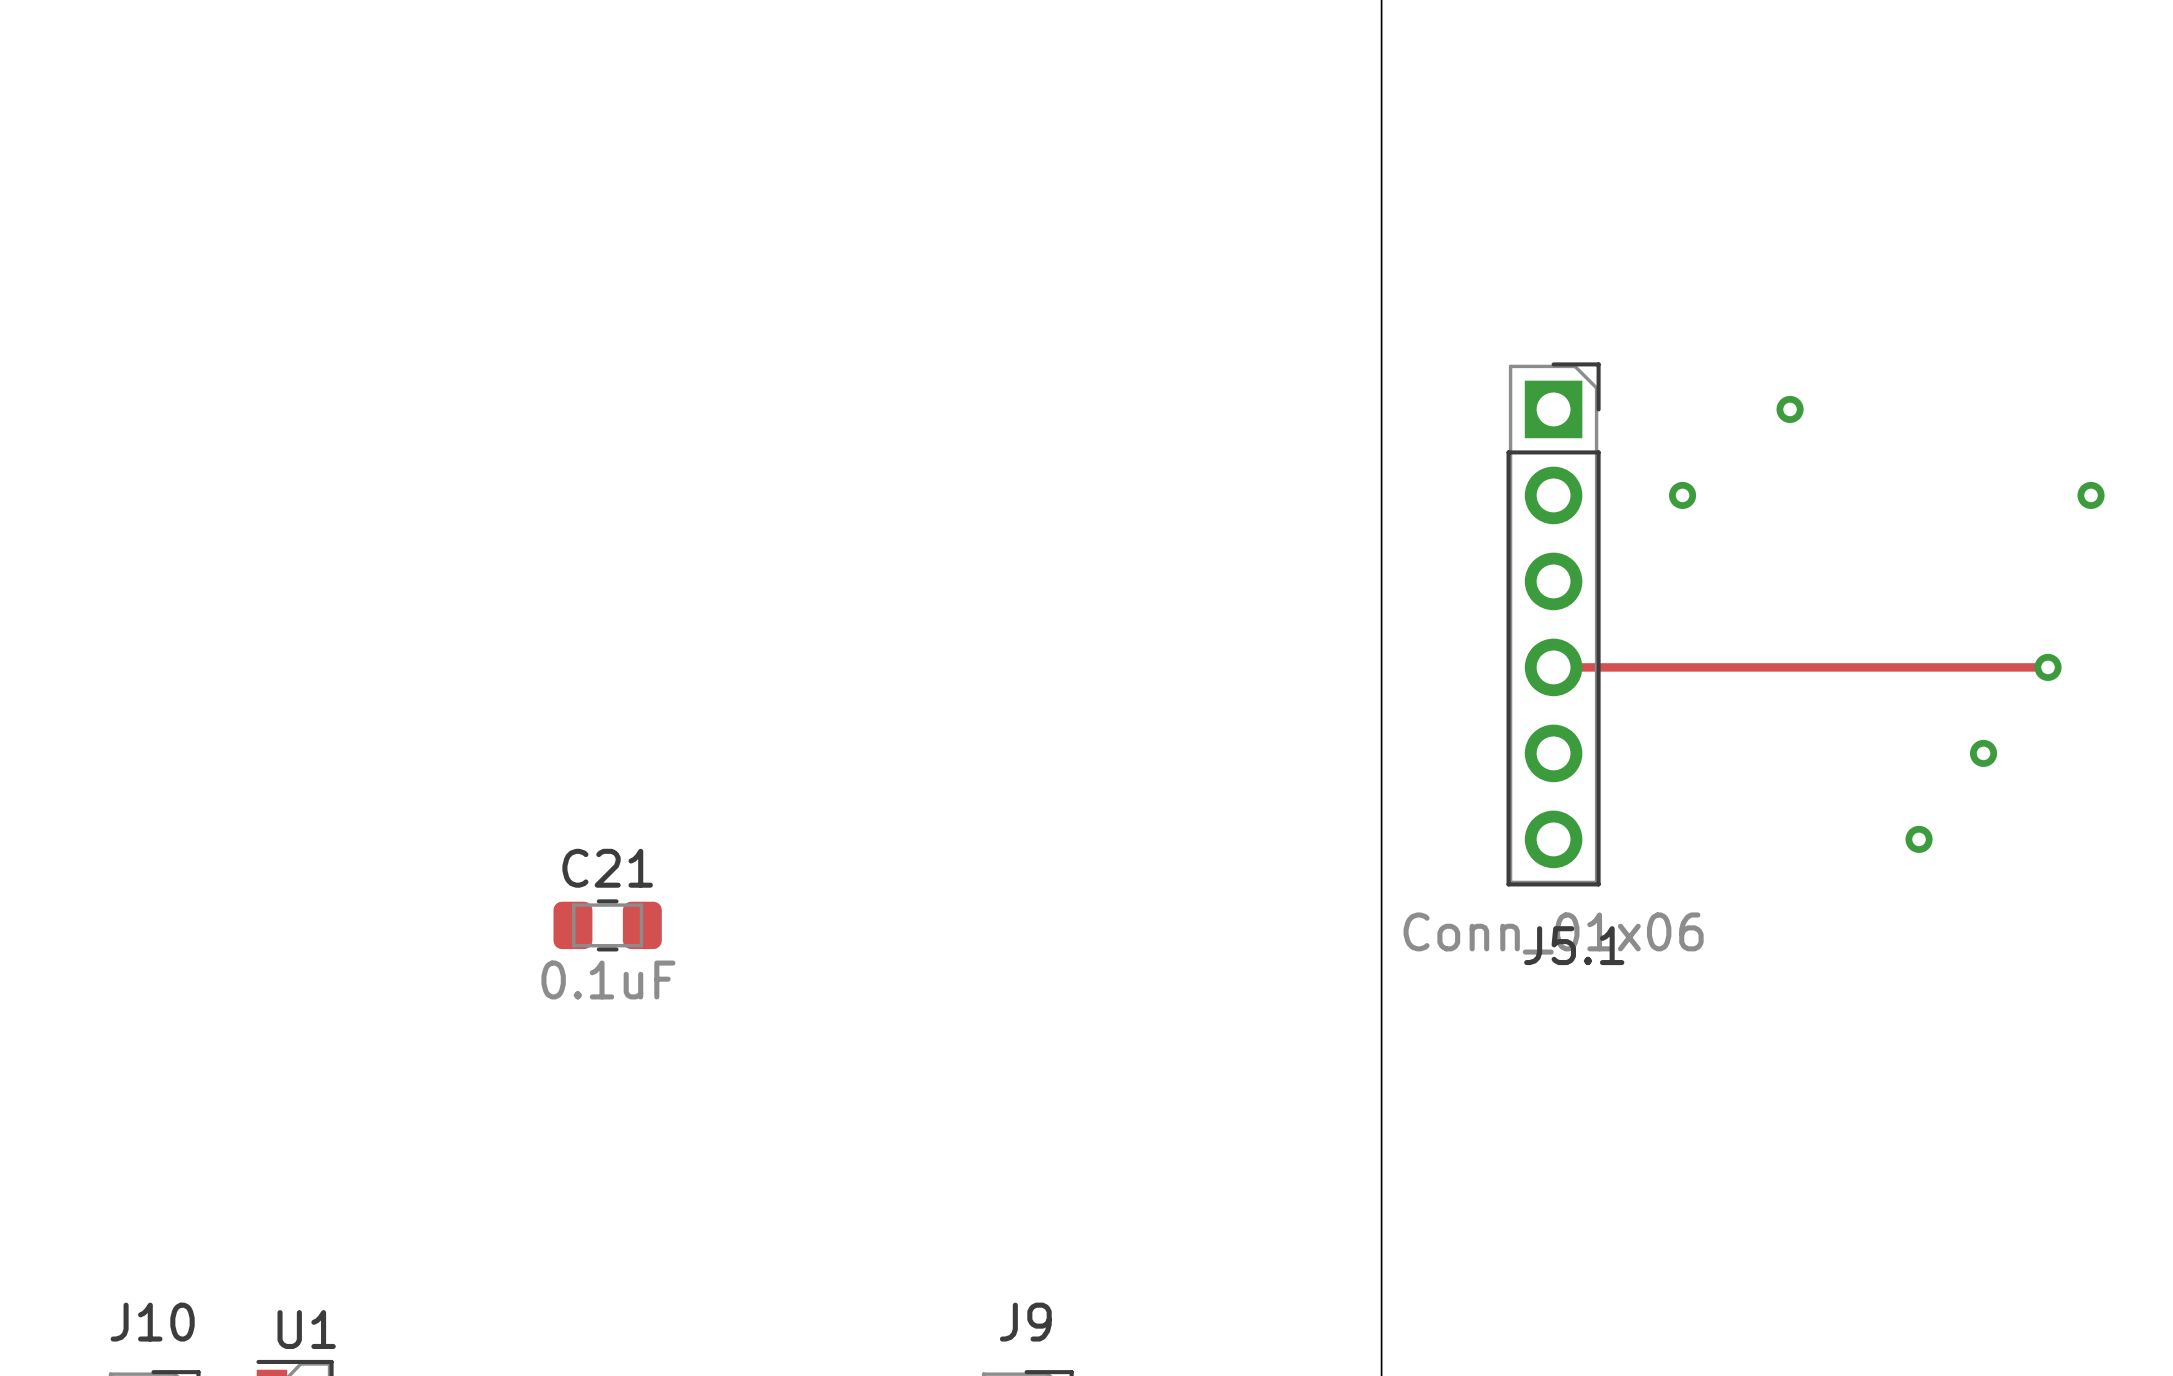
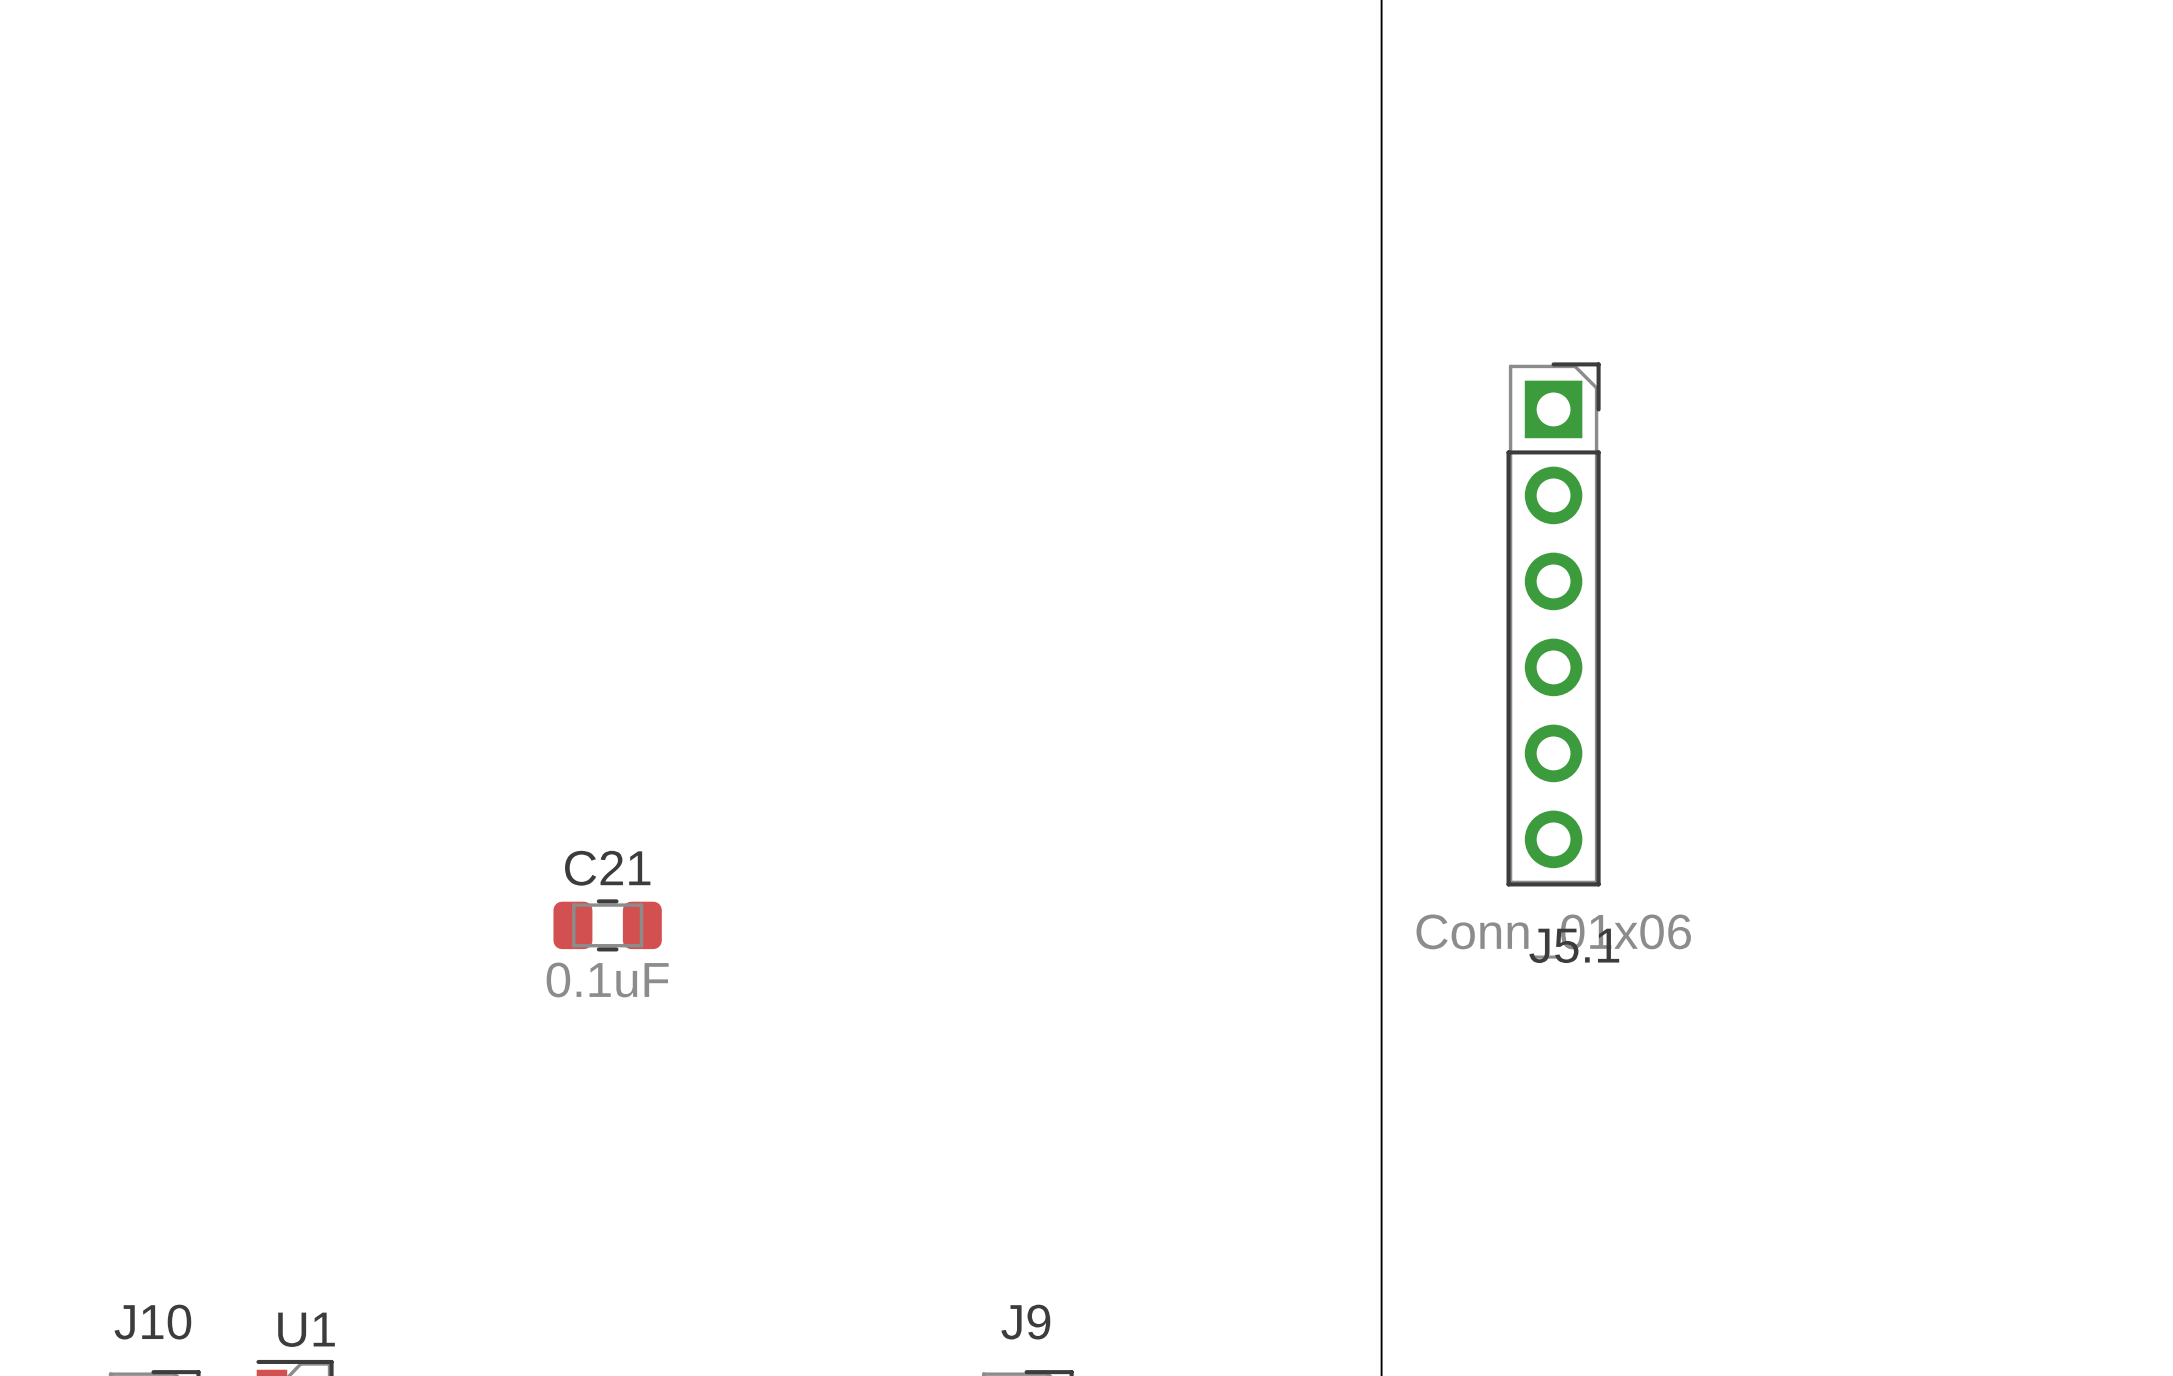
via: (1790, 409) -> none
via: (1682, 495) -> none
via: (2091, 495) -> none
track: (1553, 667) (2048, 667) -> none
via: (2048, 667) -> none
via: (1983, 753) -> none
via: (1919, 839) -> none

